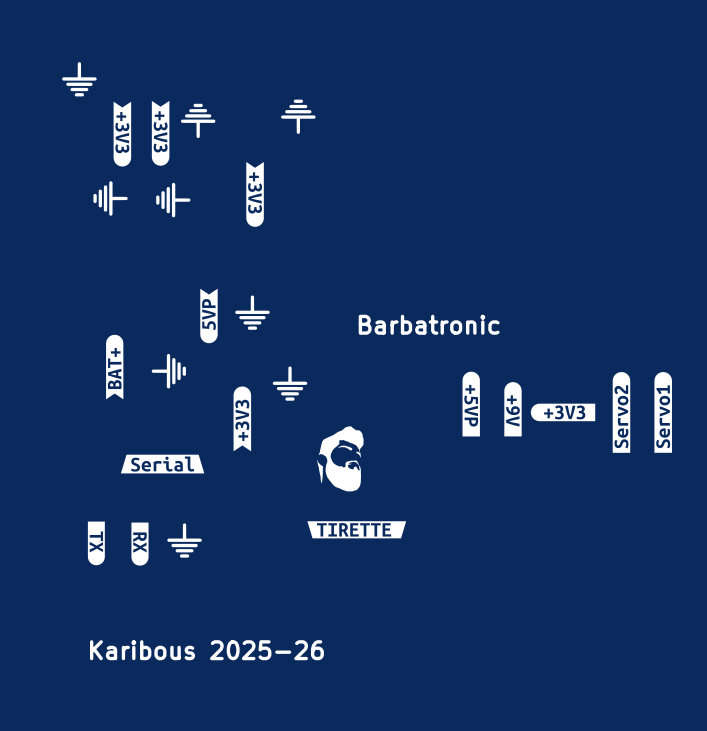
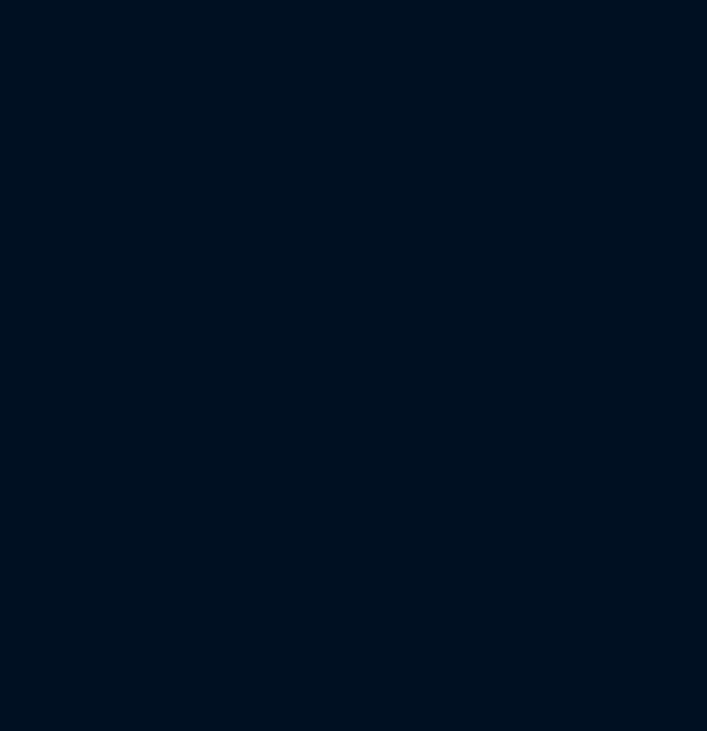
drawing: [62, 62, 132, 216] -> none
drawing: [281, 99, 316, 134] -> none
drawing: [151, 100, 216, 218] -> none
drawing: [246, 161, 264, 227] -> none
drawing: [151, 288, 270, 389] -> none
text: Barbatronic (429, 324) -> none
drawing: [106, 334, 124, 400] -> none
drawing: [272, 366, 308, 401] -> none
drawing: [462, 371, 480, 437] -> none
drawing: [504, 372, 631, 453] -> none
drawing: [654, 372, 672, 453] -> none
drawing: [233, 386, 252, 452] -> none
drawing: [317, 426, 364, 492] -> none
drawing: [120, 454, 205, 474] -> none
drawing: [87, 521, 105, 566] -> none
drawing: [307, 521, 407, 539] -> none
drawing: [131, 522, 202, 566] -> none
text: Karibous 2025-26 (206, 650) -> none

